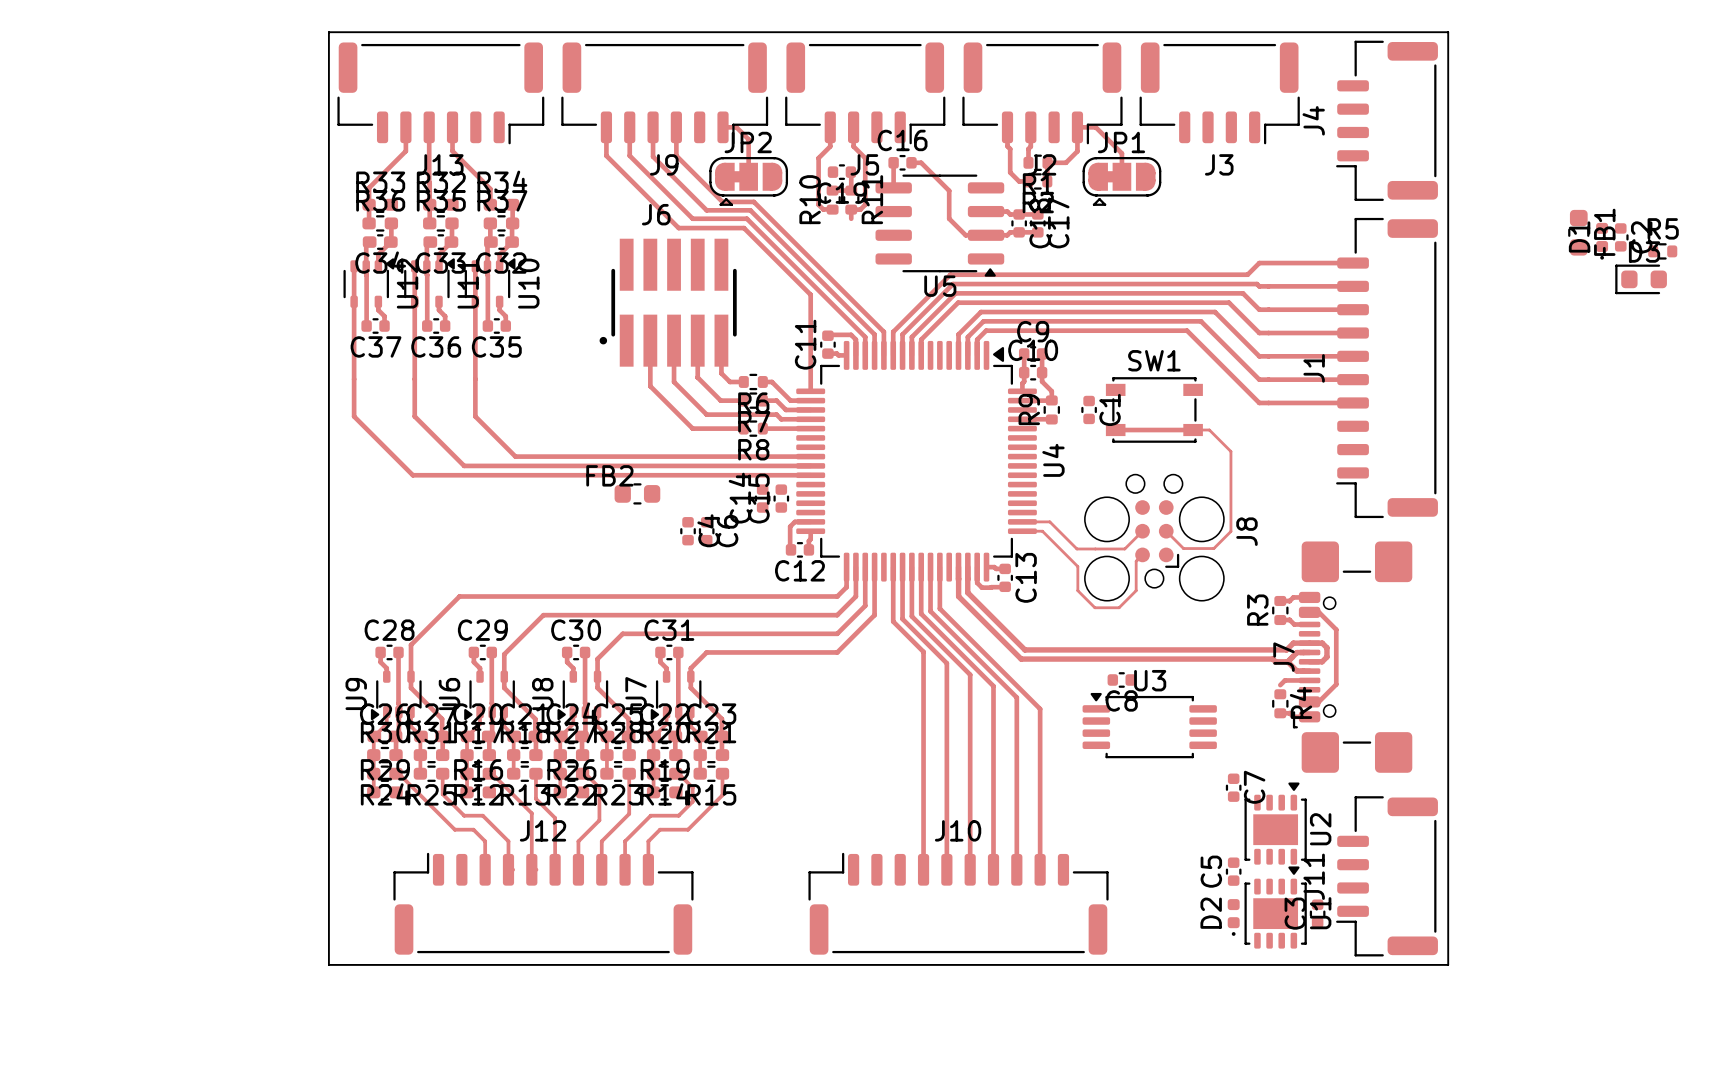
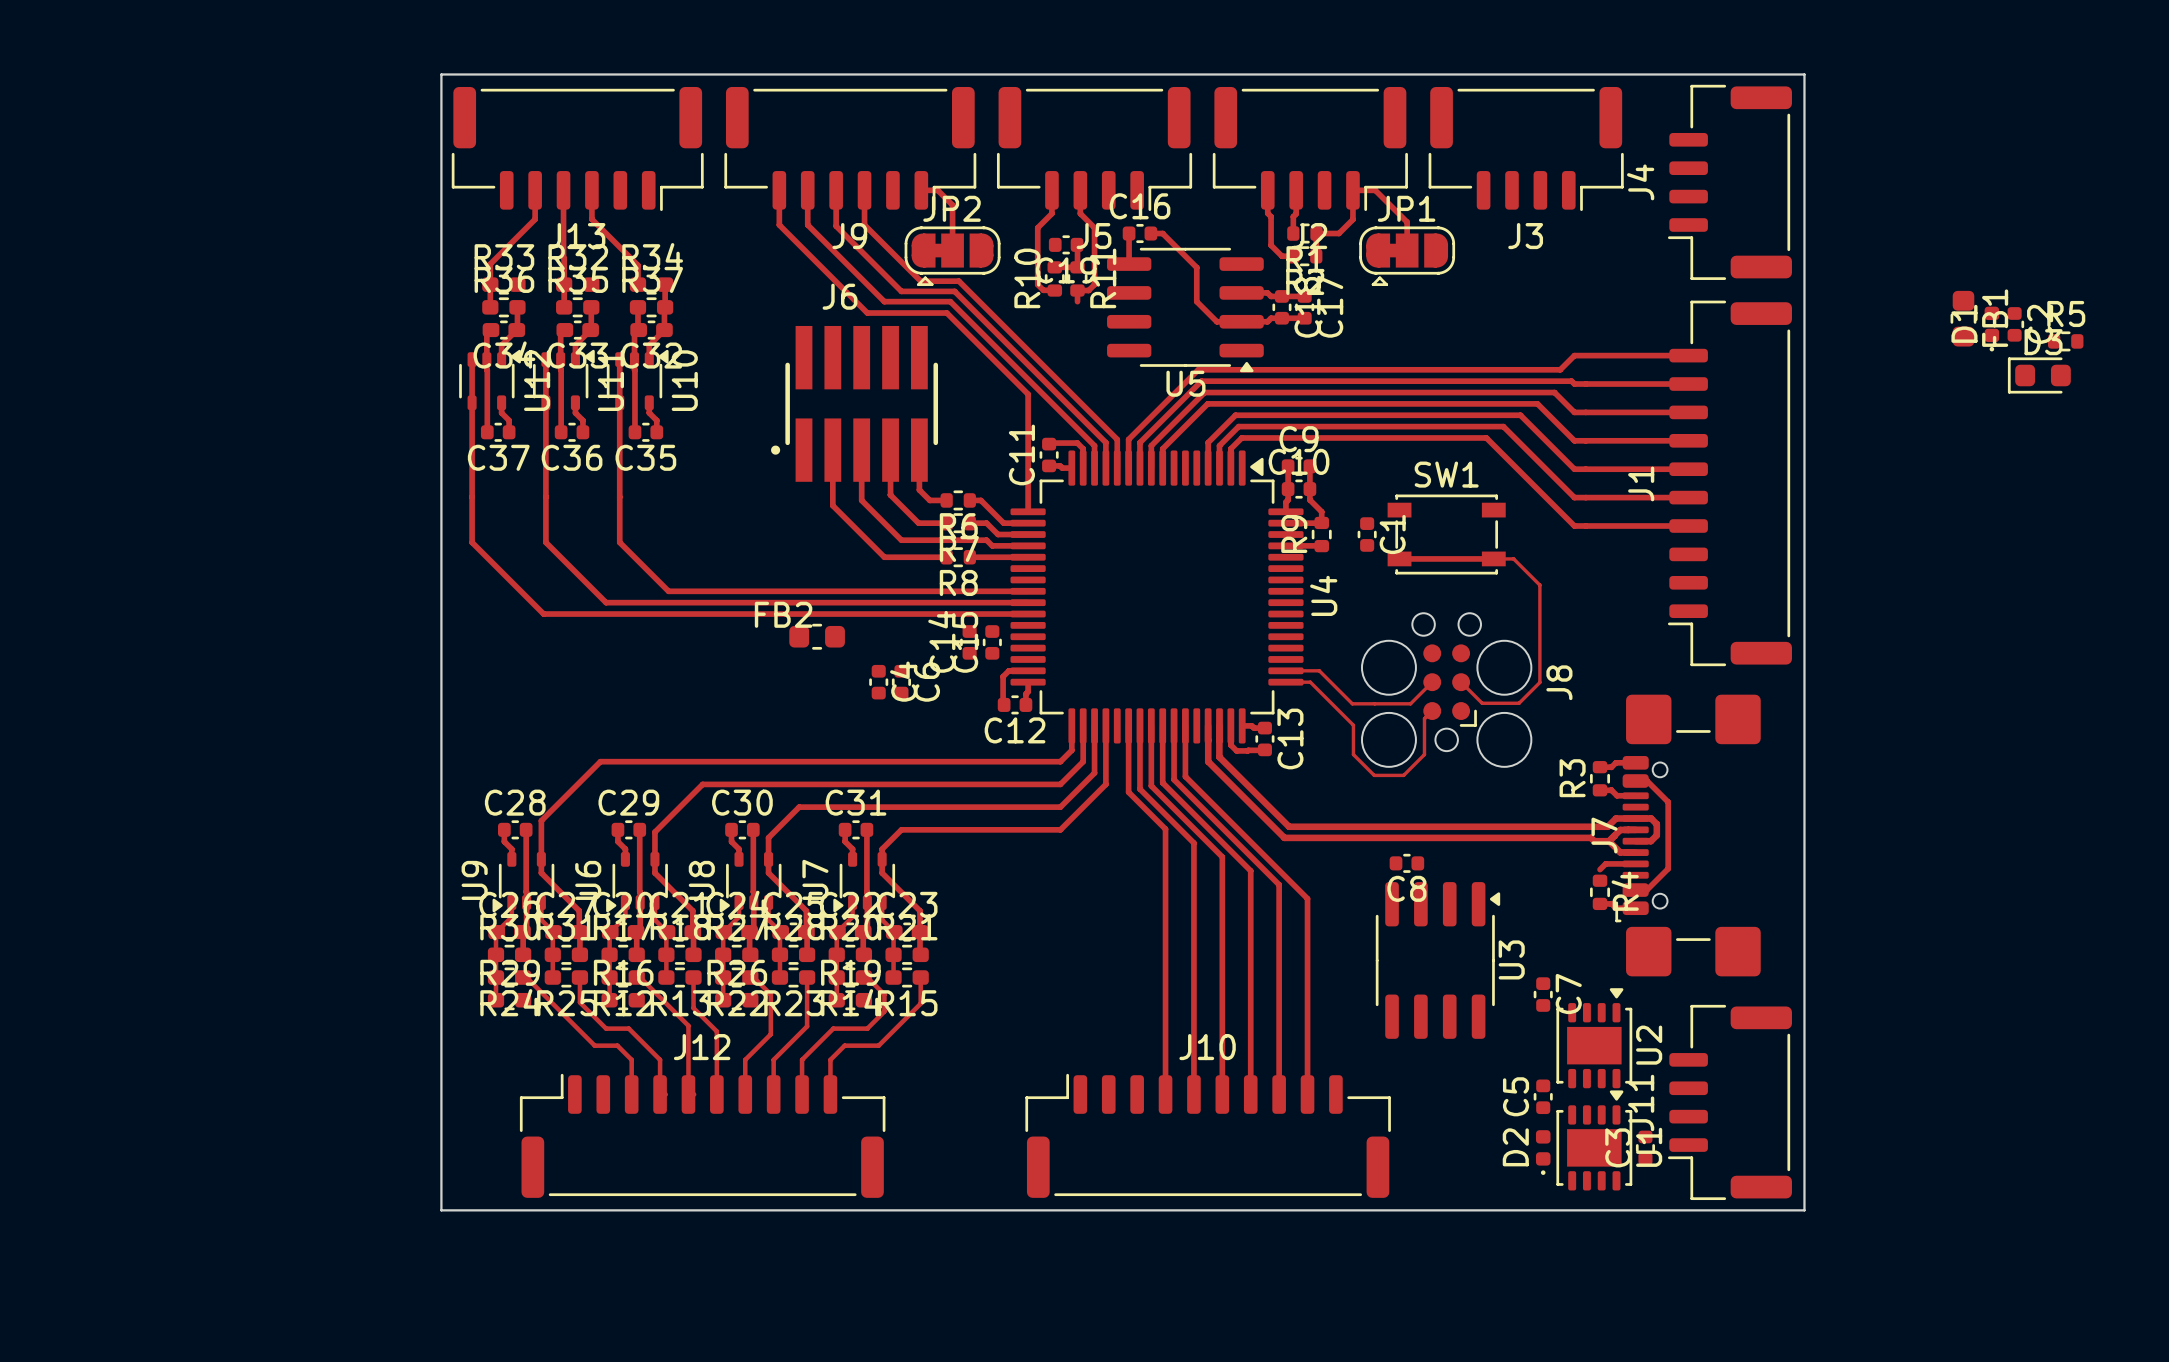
U3 name position: U3 (1150, 680) -> U3 (1511, 959)
U3 footprint: [1082, 692, 1217, 759] -> [1375, 882, 1501, 1039]

